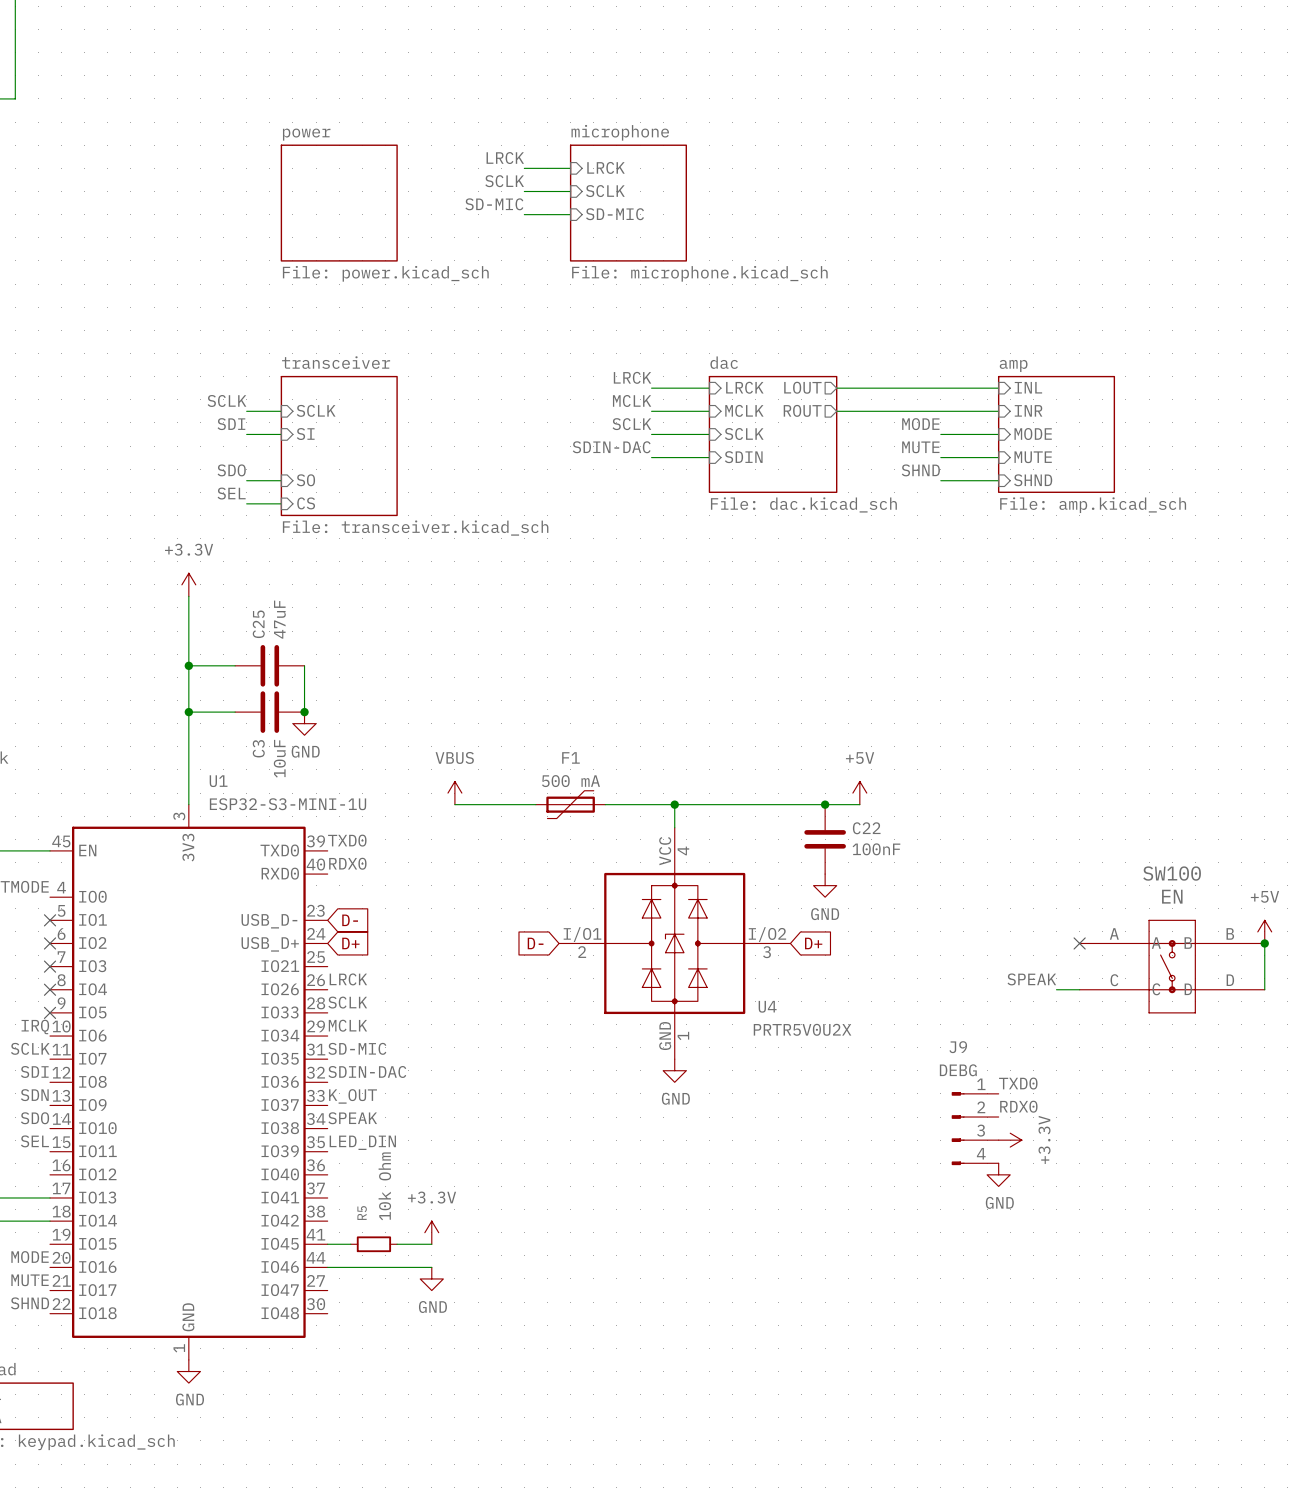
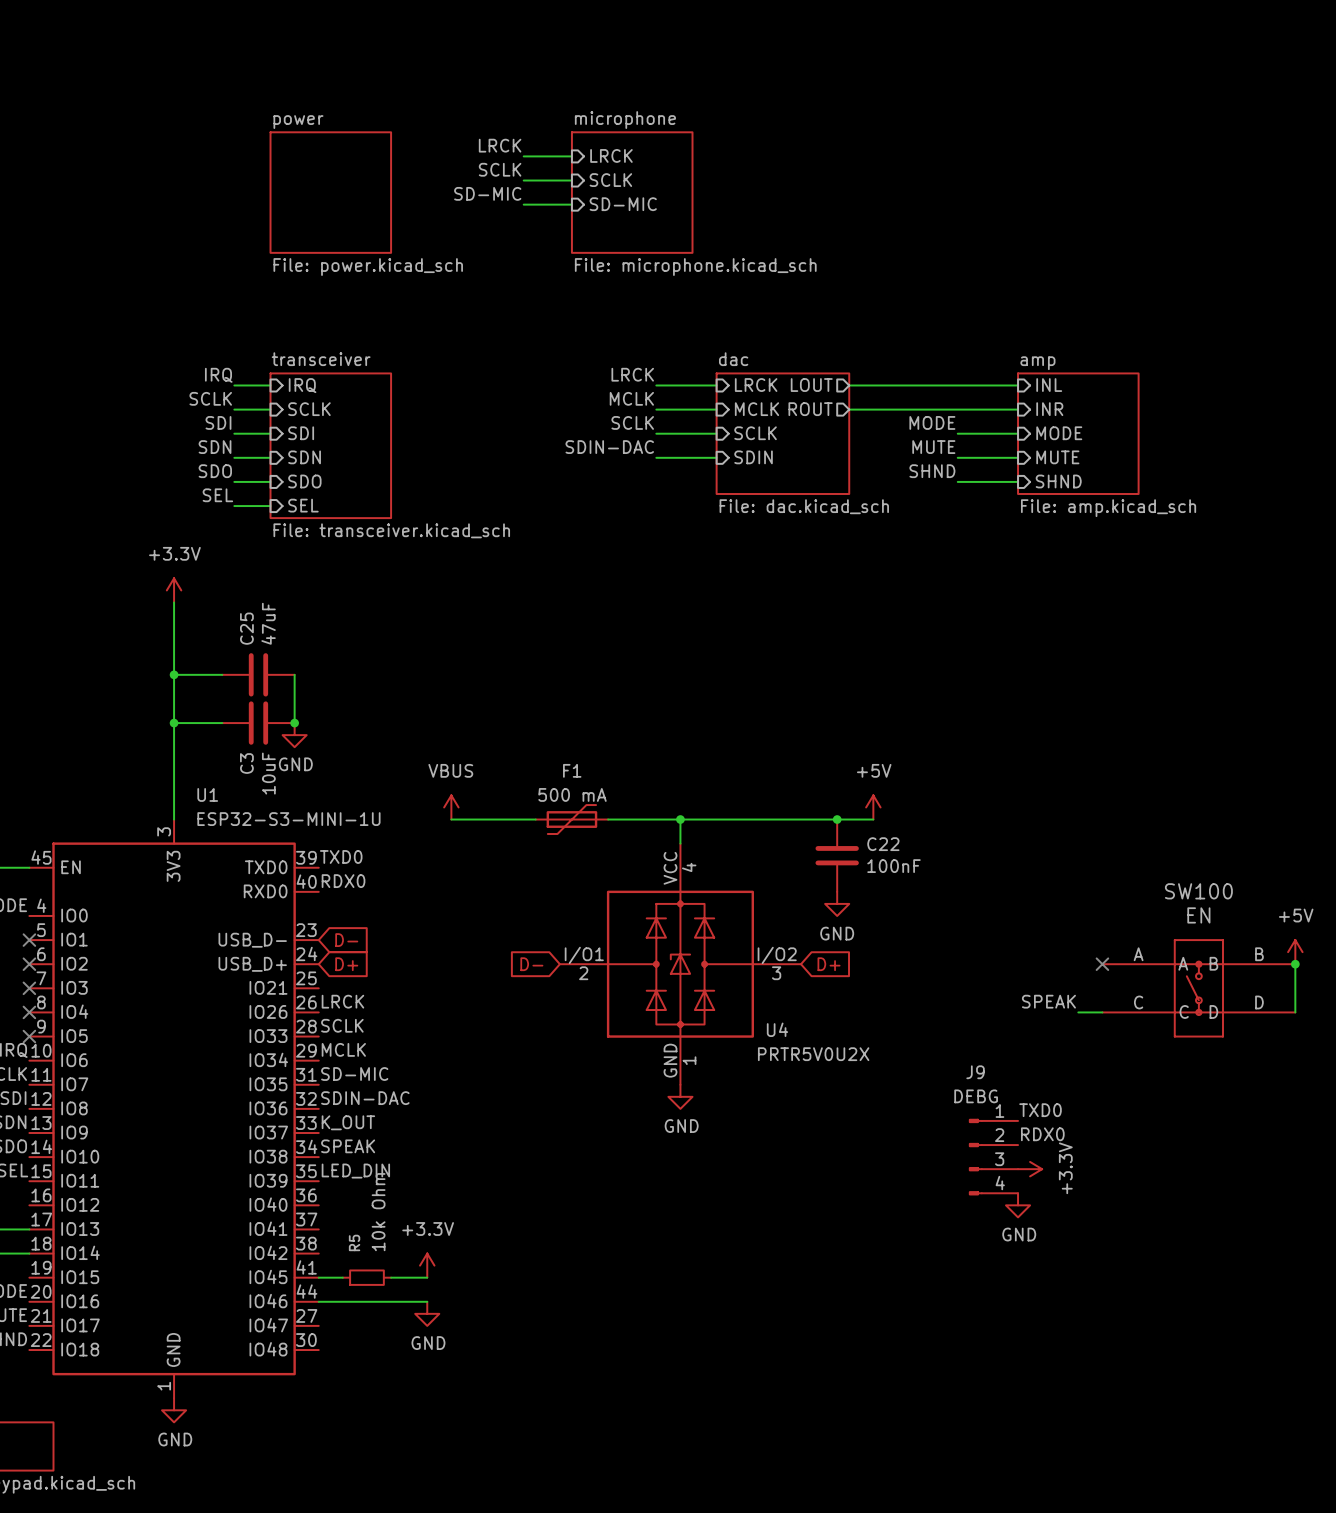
label: none -> IRQ (218, 375)
wire: none -> (234, 385) (270, 385)
sheet pin: none -> IRQ (302, 385)
sheet pin: SI (305, 434) -> SDI (301, 433)
label: none -> SDN (215, 447)
wire: none -> (234, 457) (270, 457)
sheet pin: none -> SDN (304, 457)
sheet pin: SO (305, 480) -> SDO (304, 481)
sheet pin: CS (306, 503) -> SEL (303, 505)

